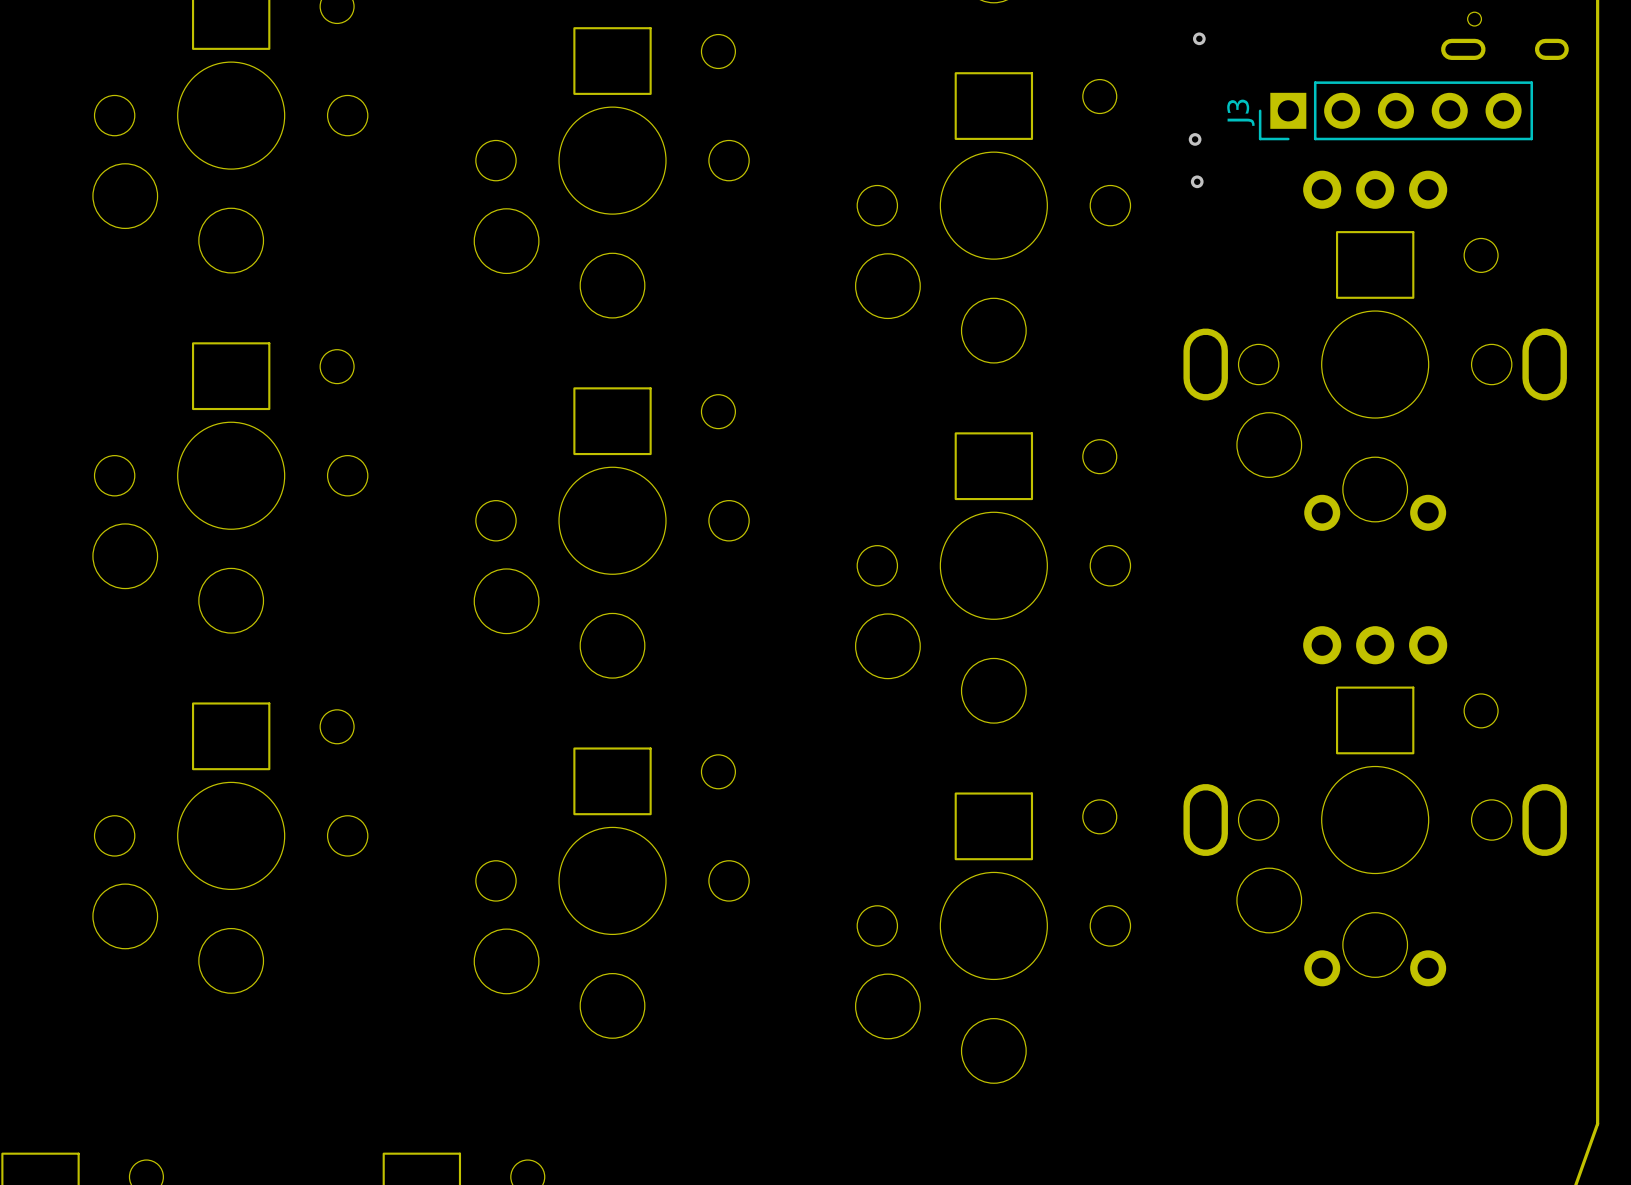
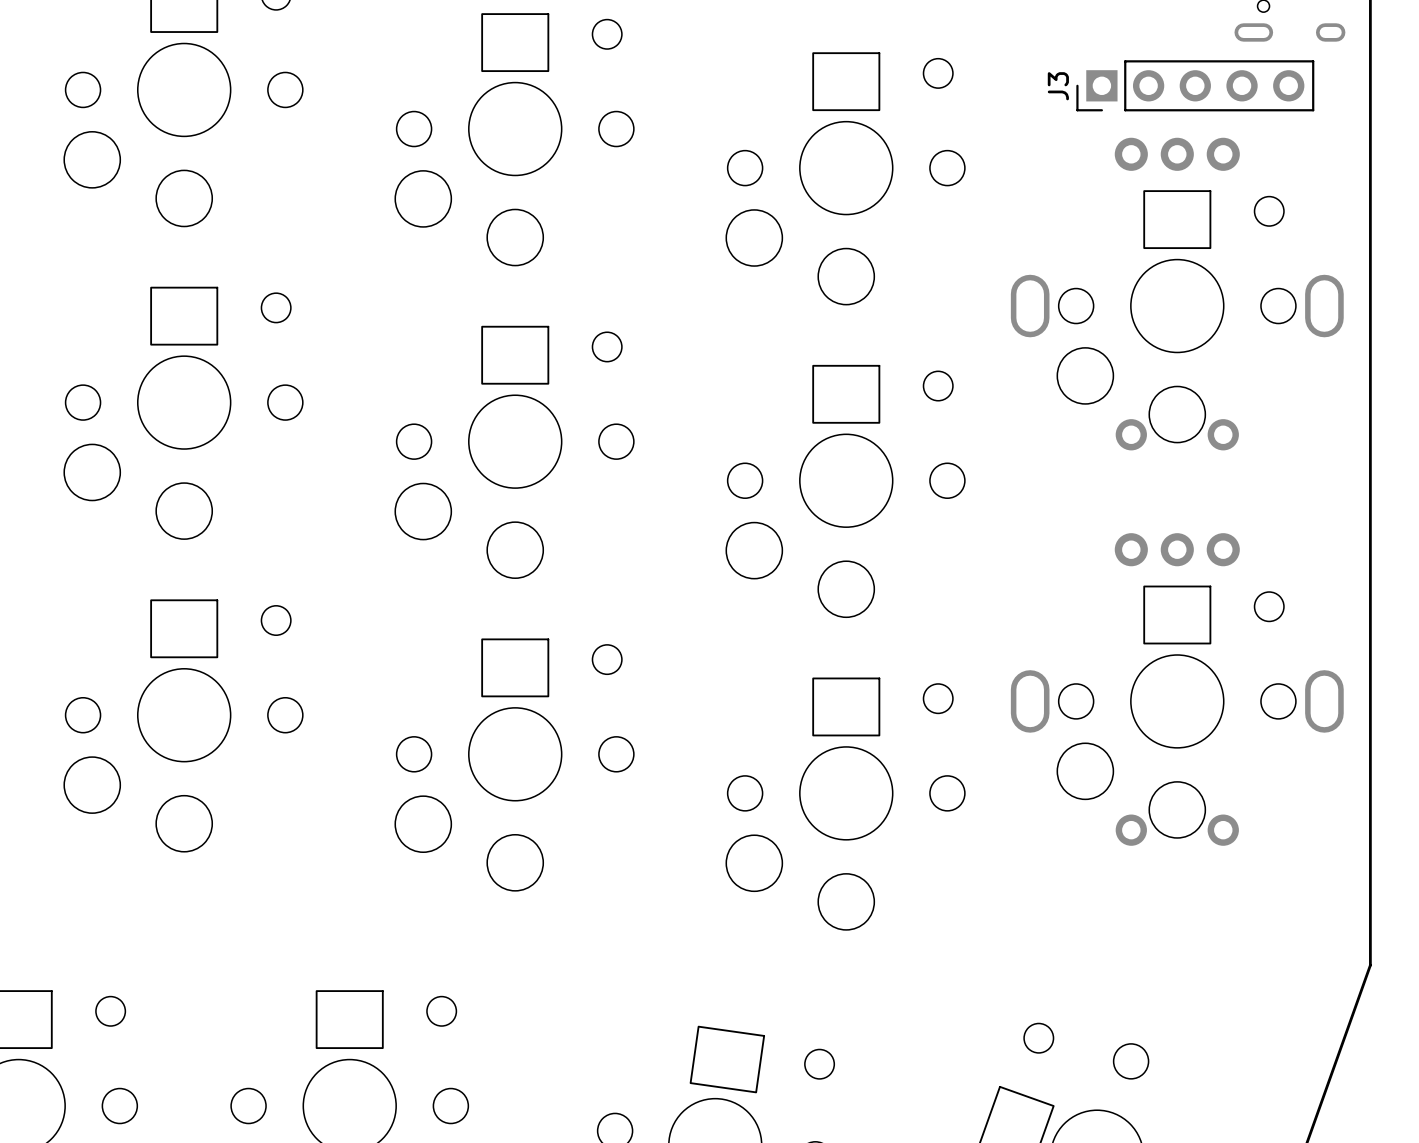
via: (1199, 38) -> none
via: (1195, 139) -> none
via: (1197, 181) -> none

